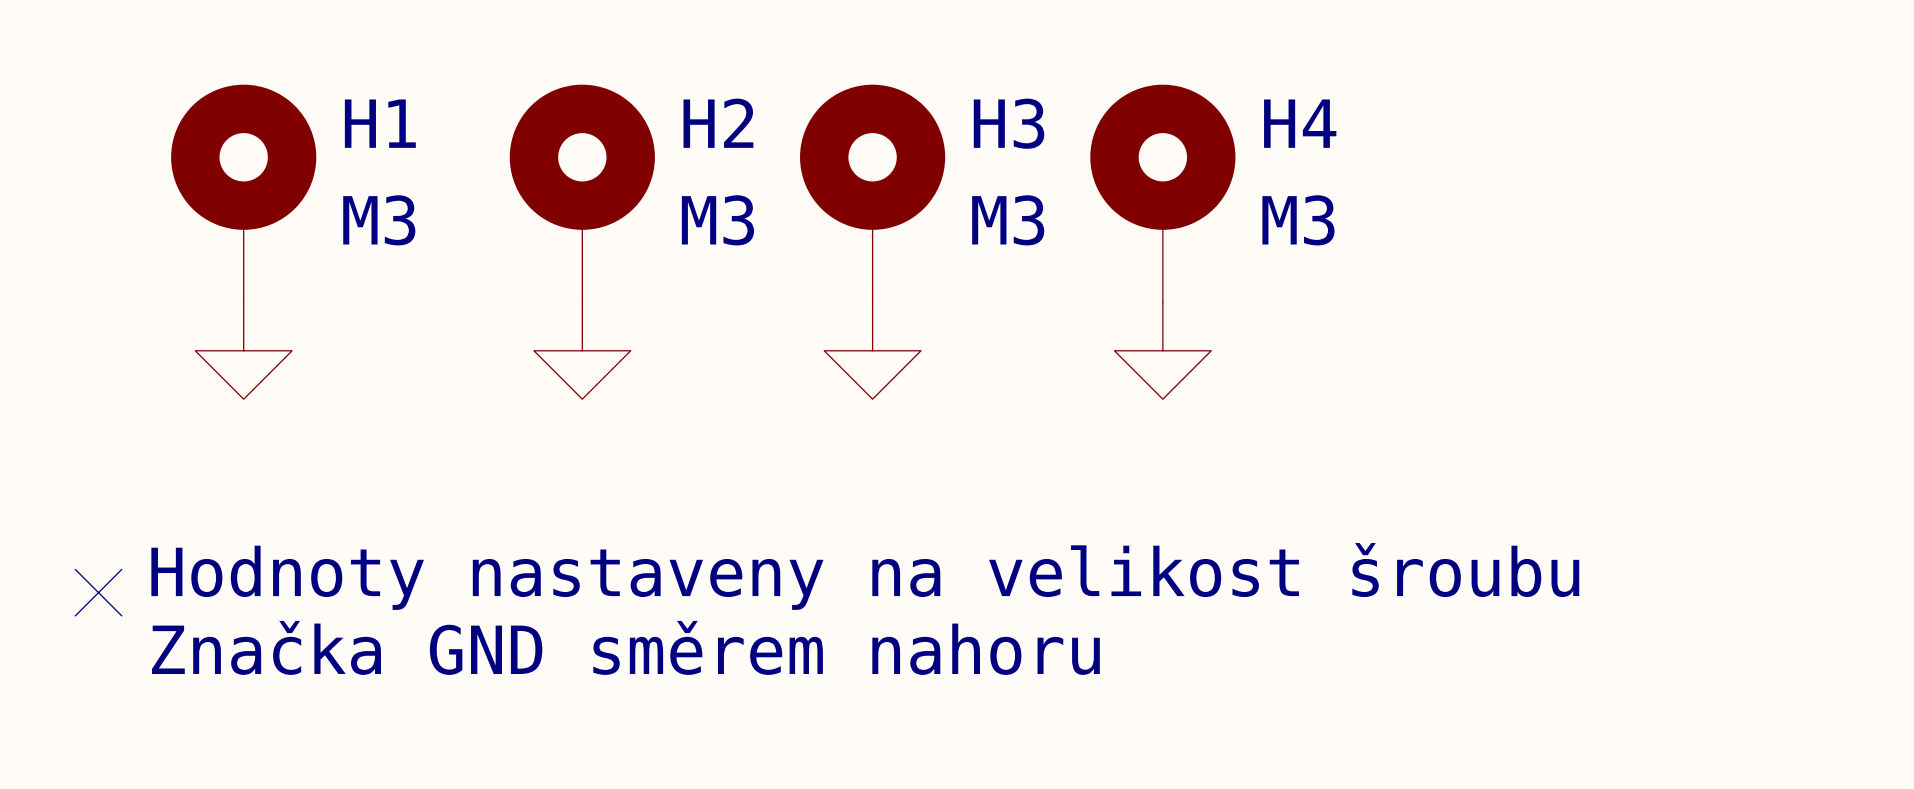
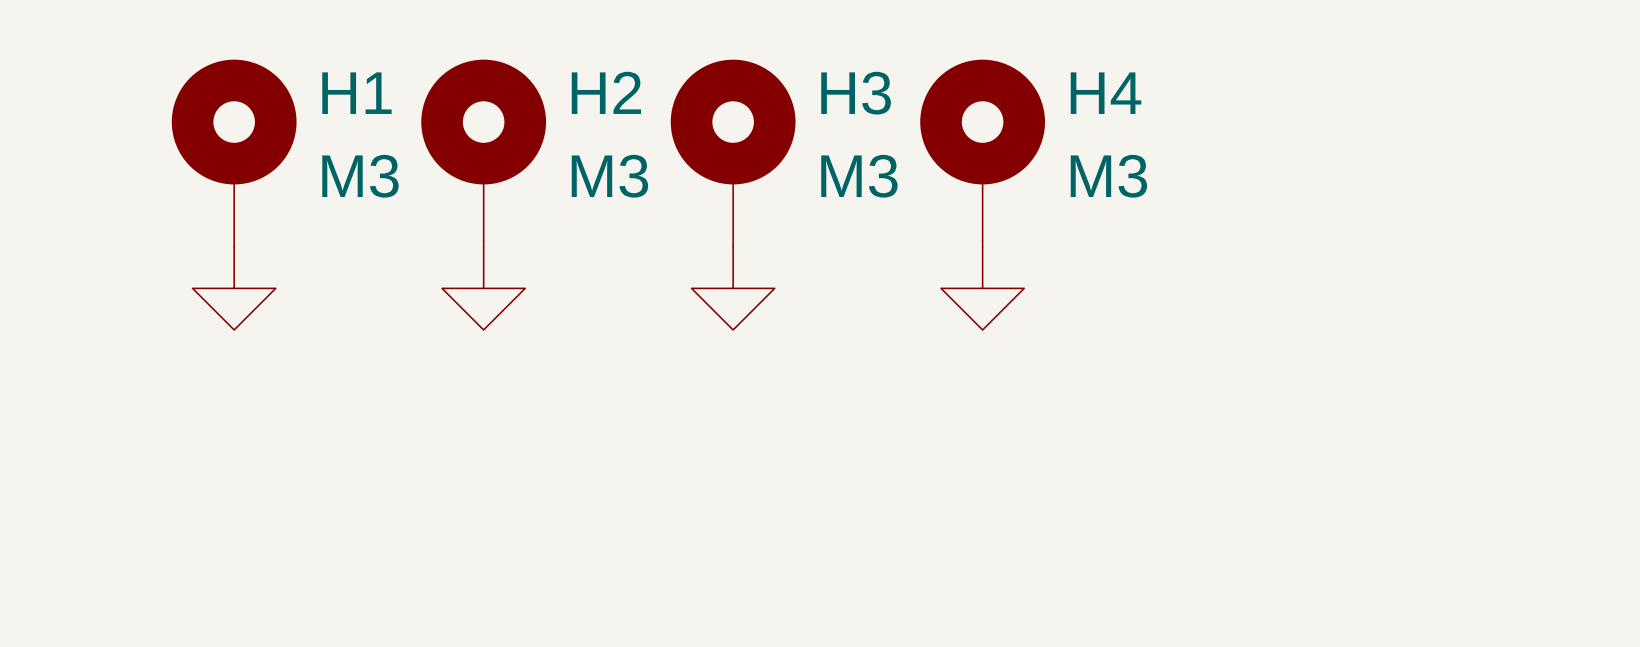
H1 position: (243, 193) -> (234, 153)
power symbol position: (243, 350) -> (234, 288)
text: Hodnoty nastaveny na velikost šroubu (865, 576) -> none
no-connect mark: (98, 592) -> none
text: Značka GND směrem nahoru (625, 647) -> none

